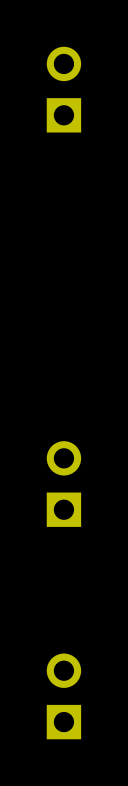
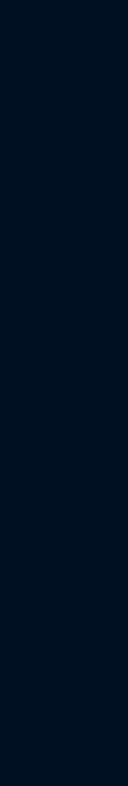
part: (63, 89) -> none
part: (63, 484) -> none
part: (63, 696) -> none

